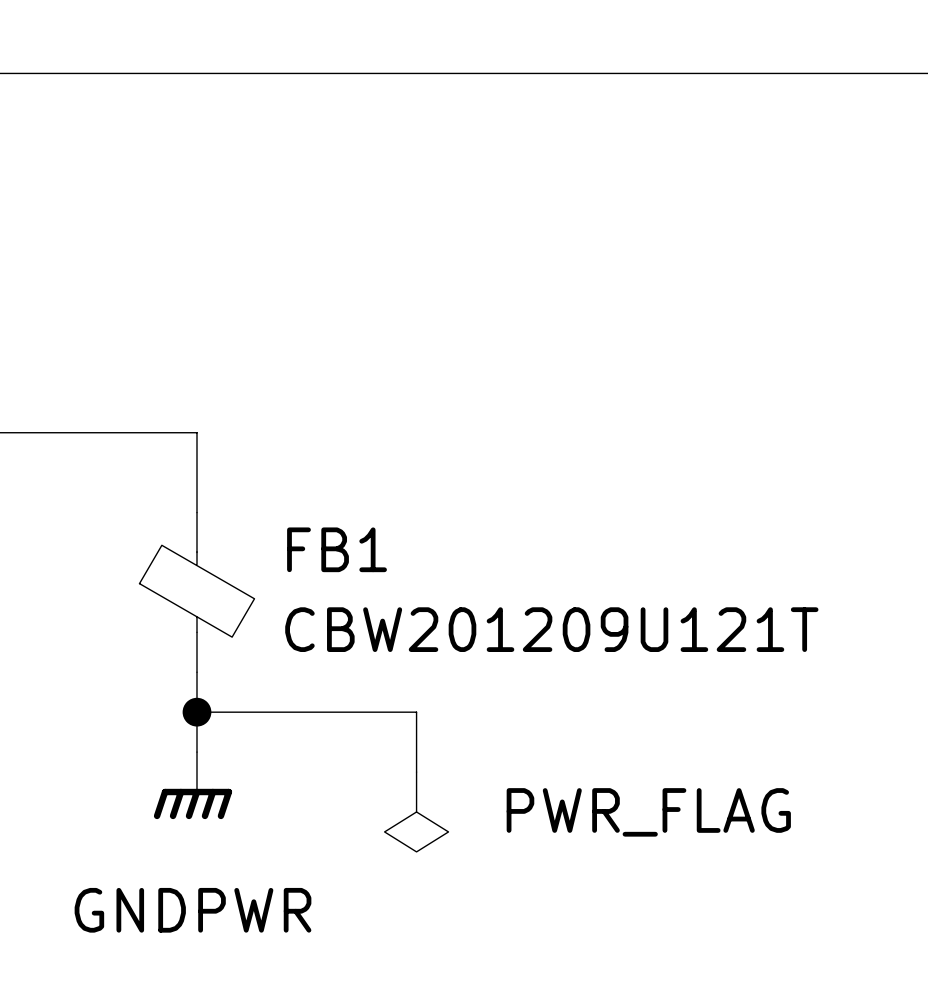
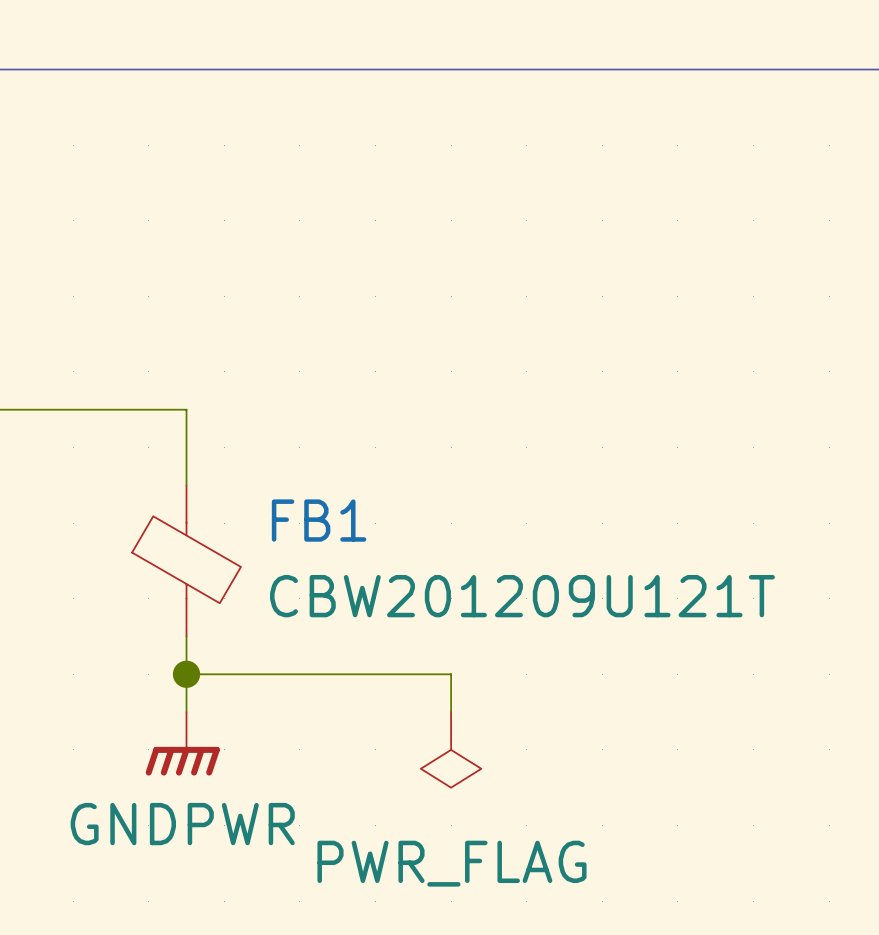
wire: (416, 712) (416, 772) -> (394, 674) (451, 674) (451, 712)
power symbol position: PWR_FLAG (416, 811) -> PWR_FLAG (451, 749)
power symbol text position: PWR_FLAG (648, 812) -> PWR_FLAG (451, 863)
power symbol text position: GNDPWR (193, 910) -> GNDPWR (182, 824)

